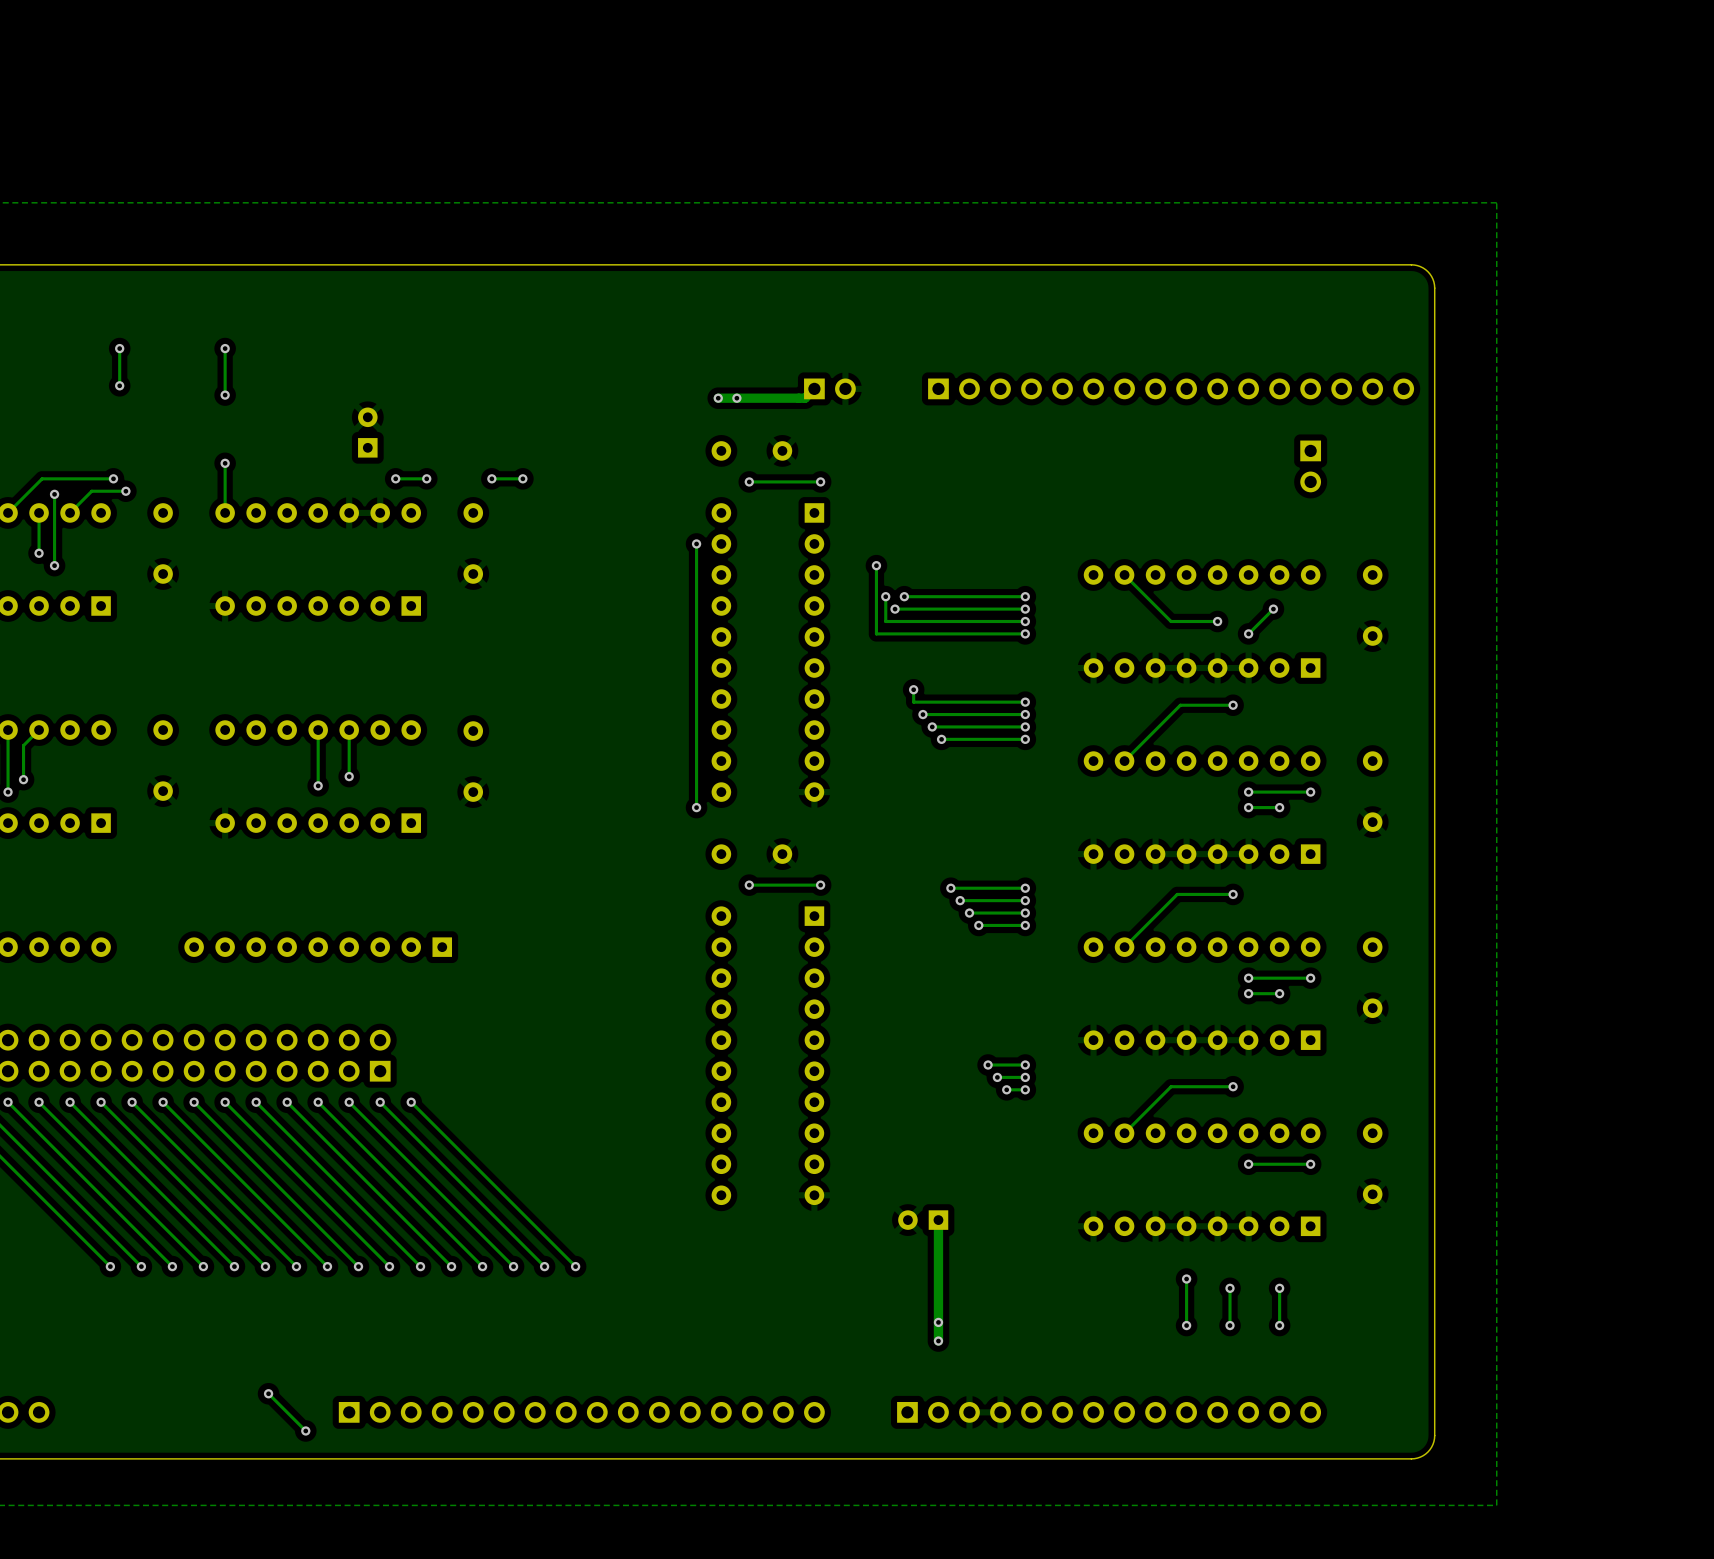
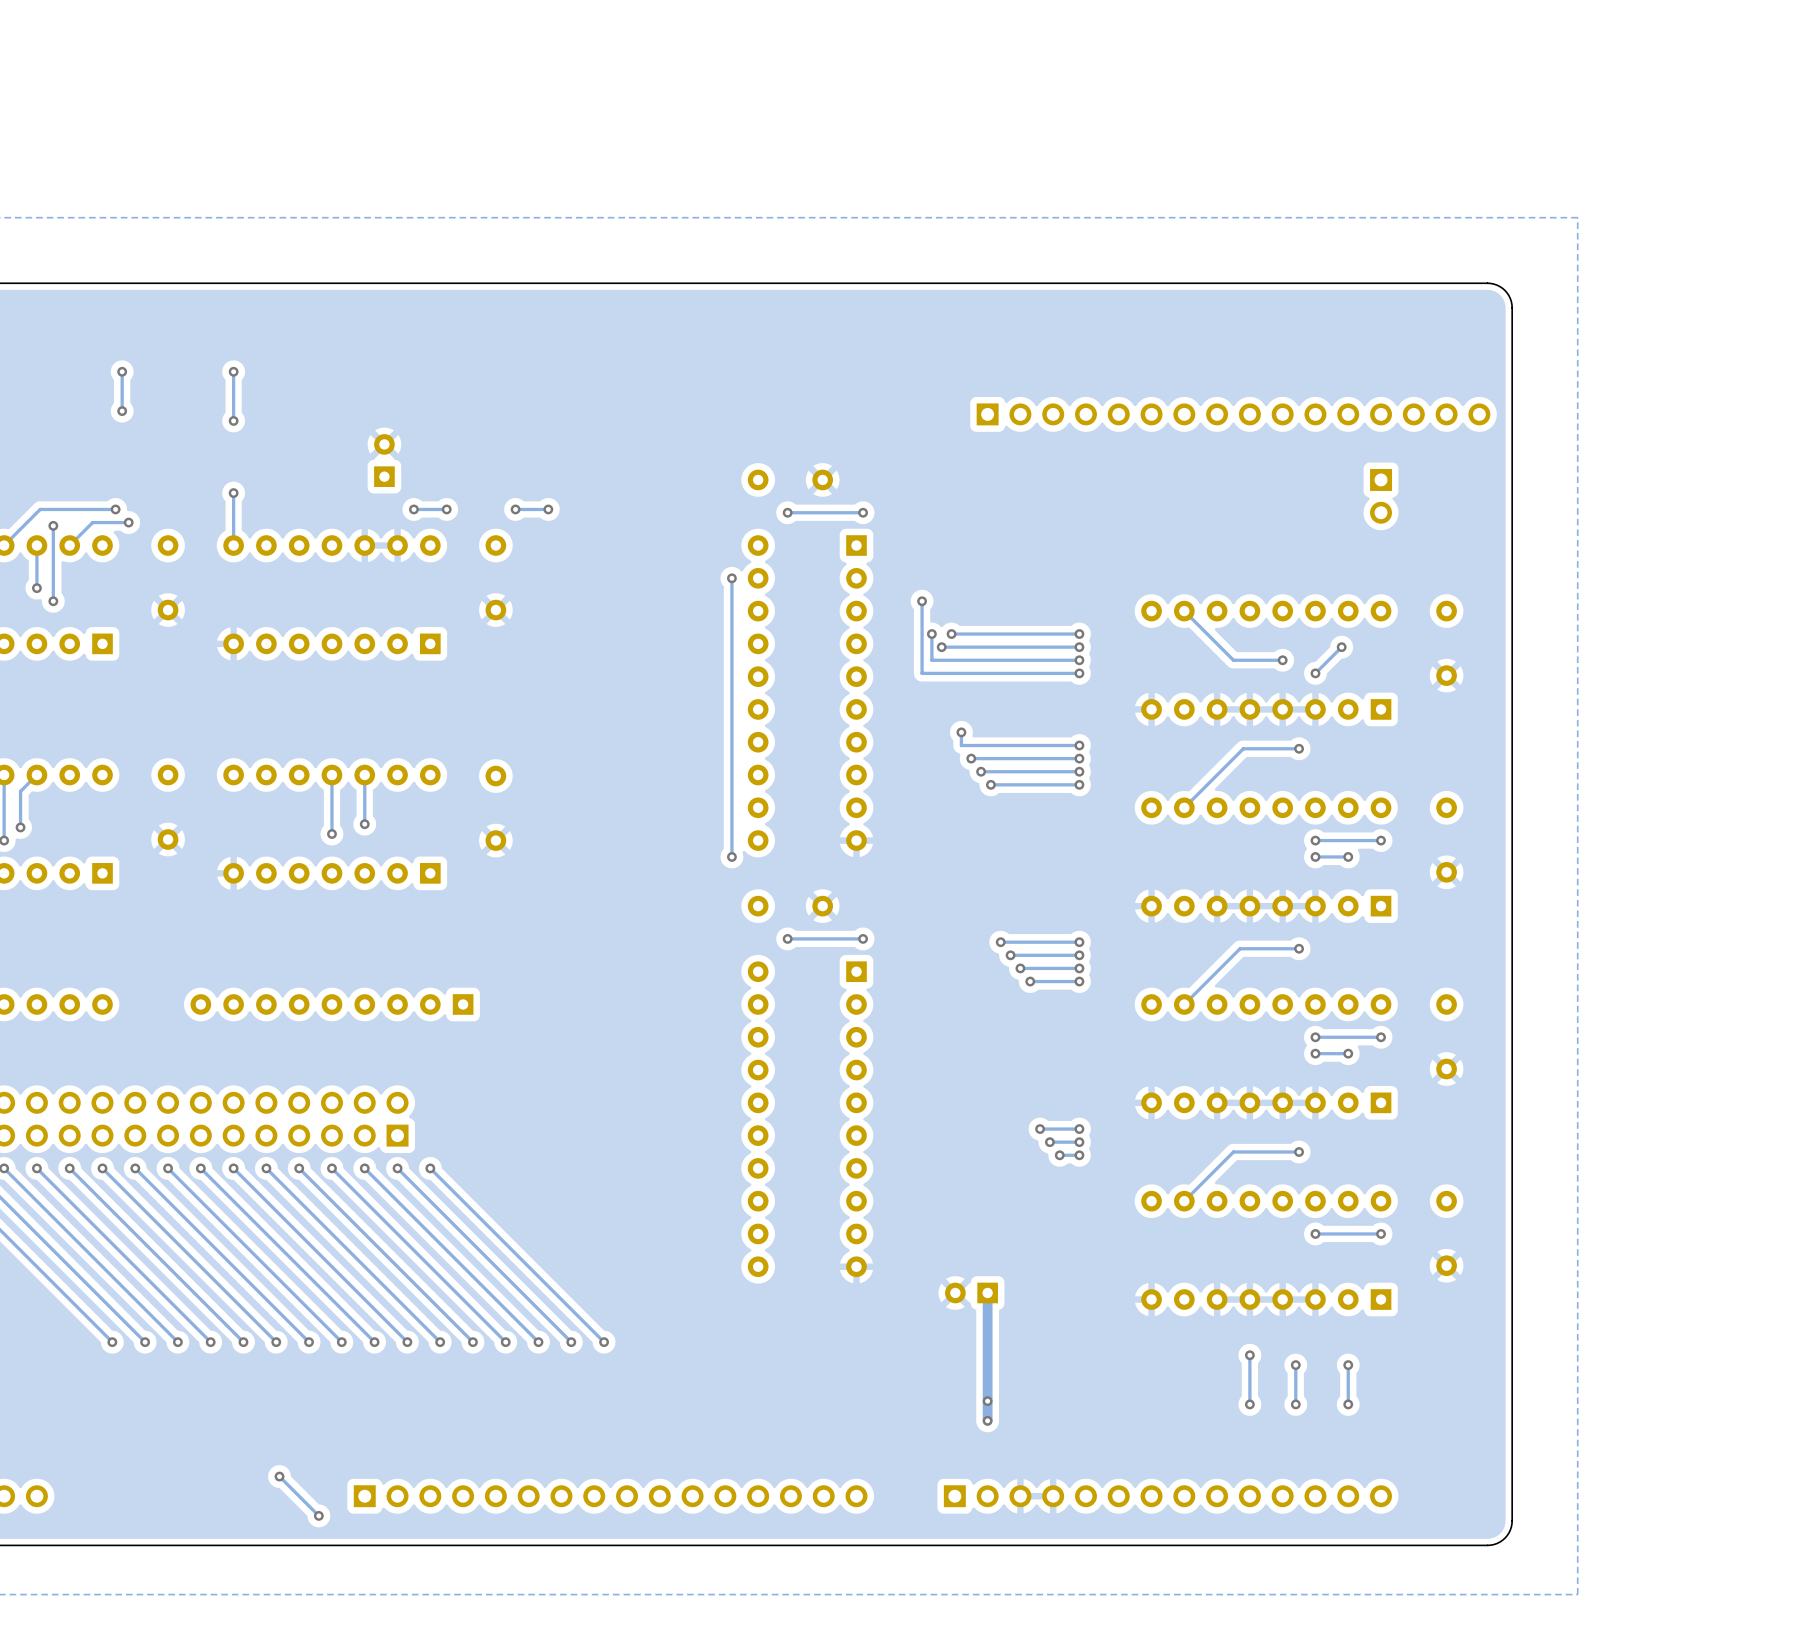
track: (814, 388) (805, 398) (718, 398) -> none
part: (829, 388) -> none
via: (718, 398) -> none
via: (736, 398) -> none

